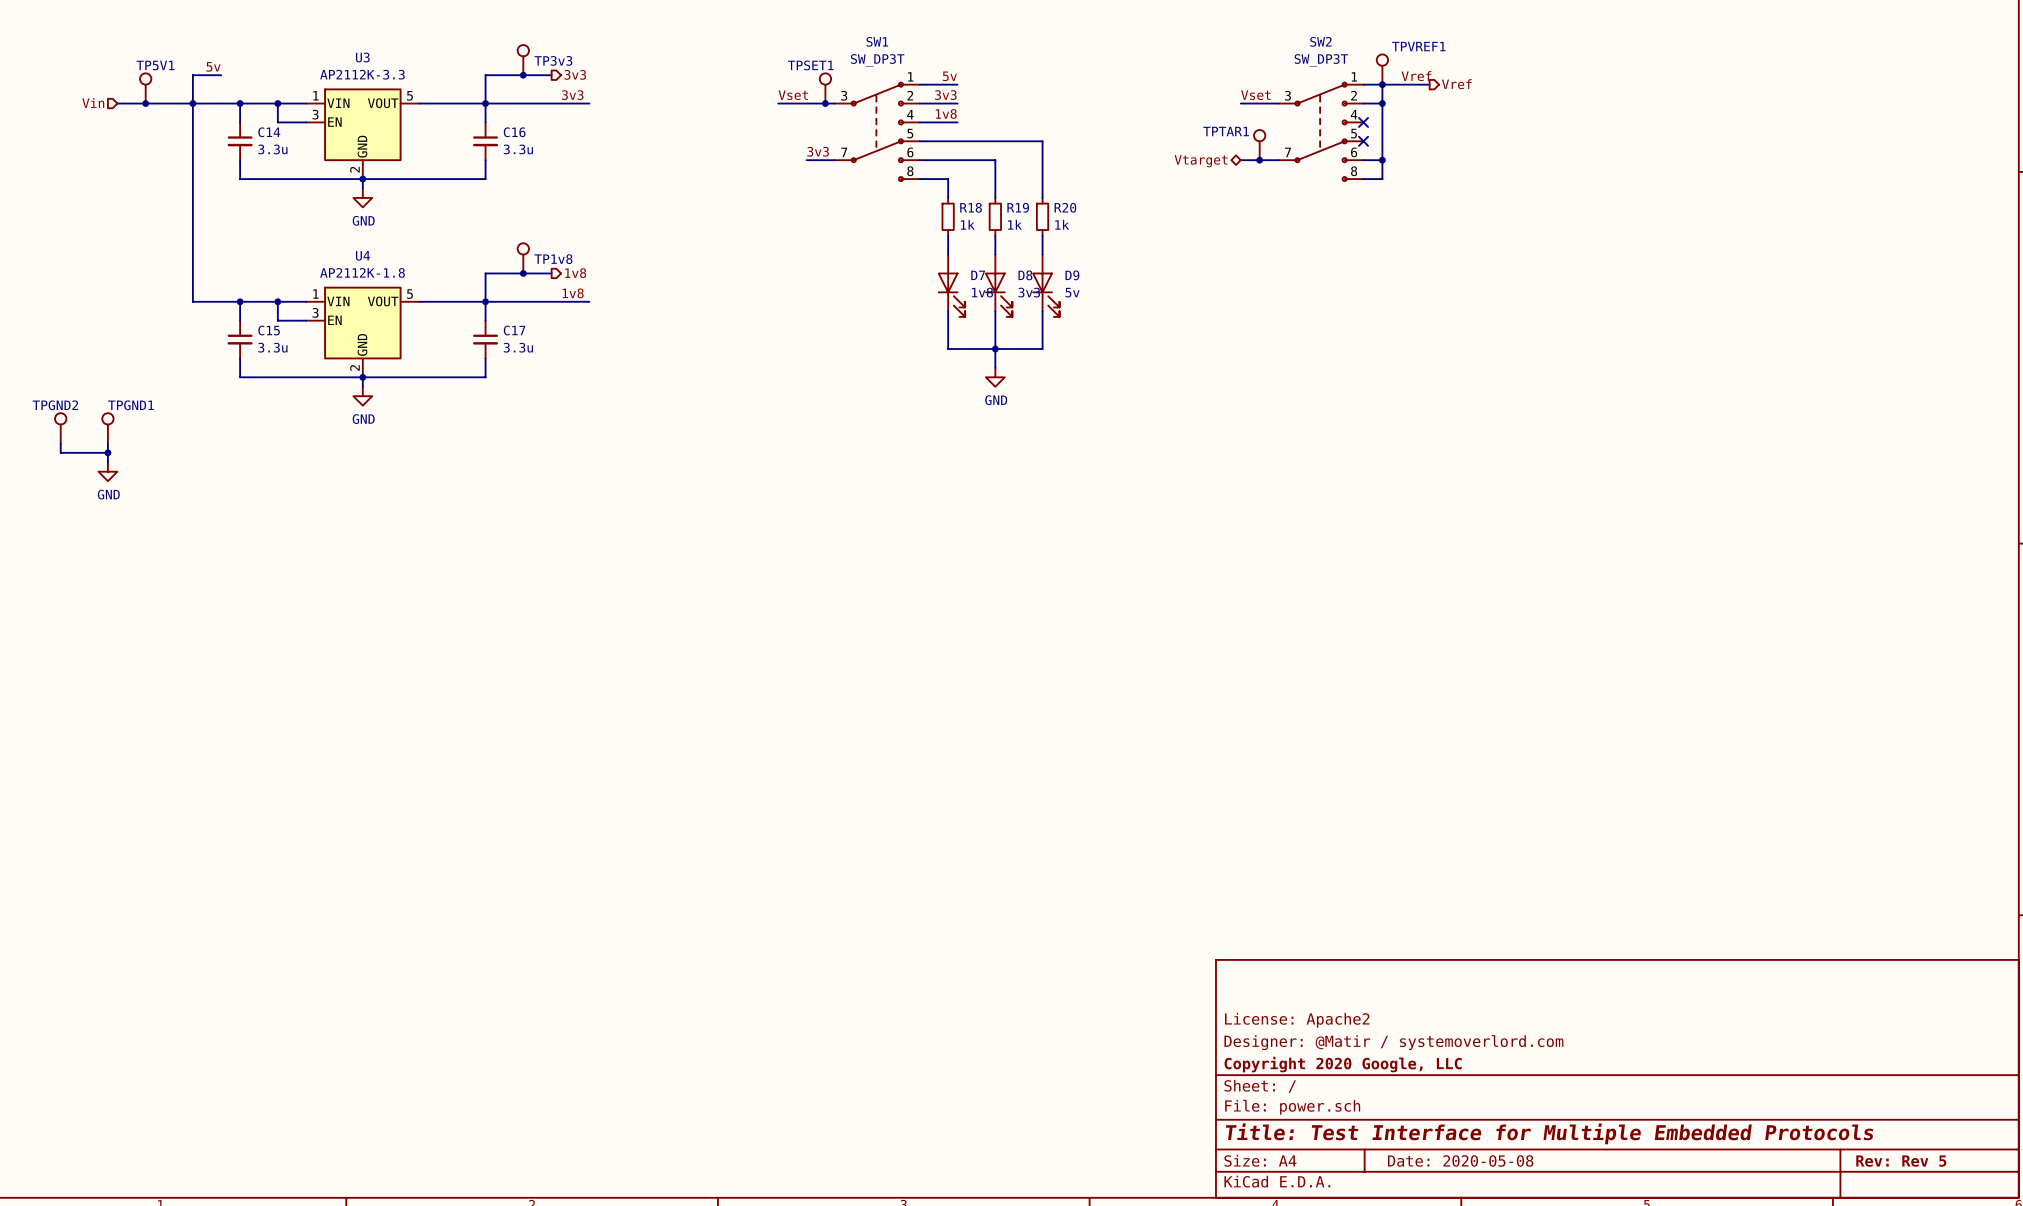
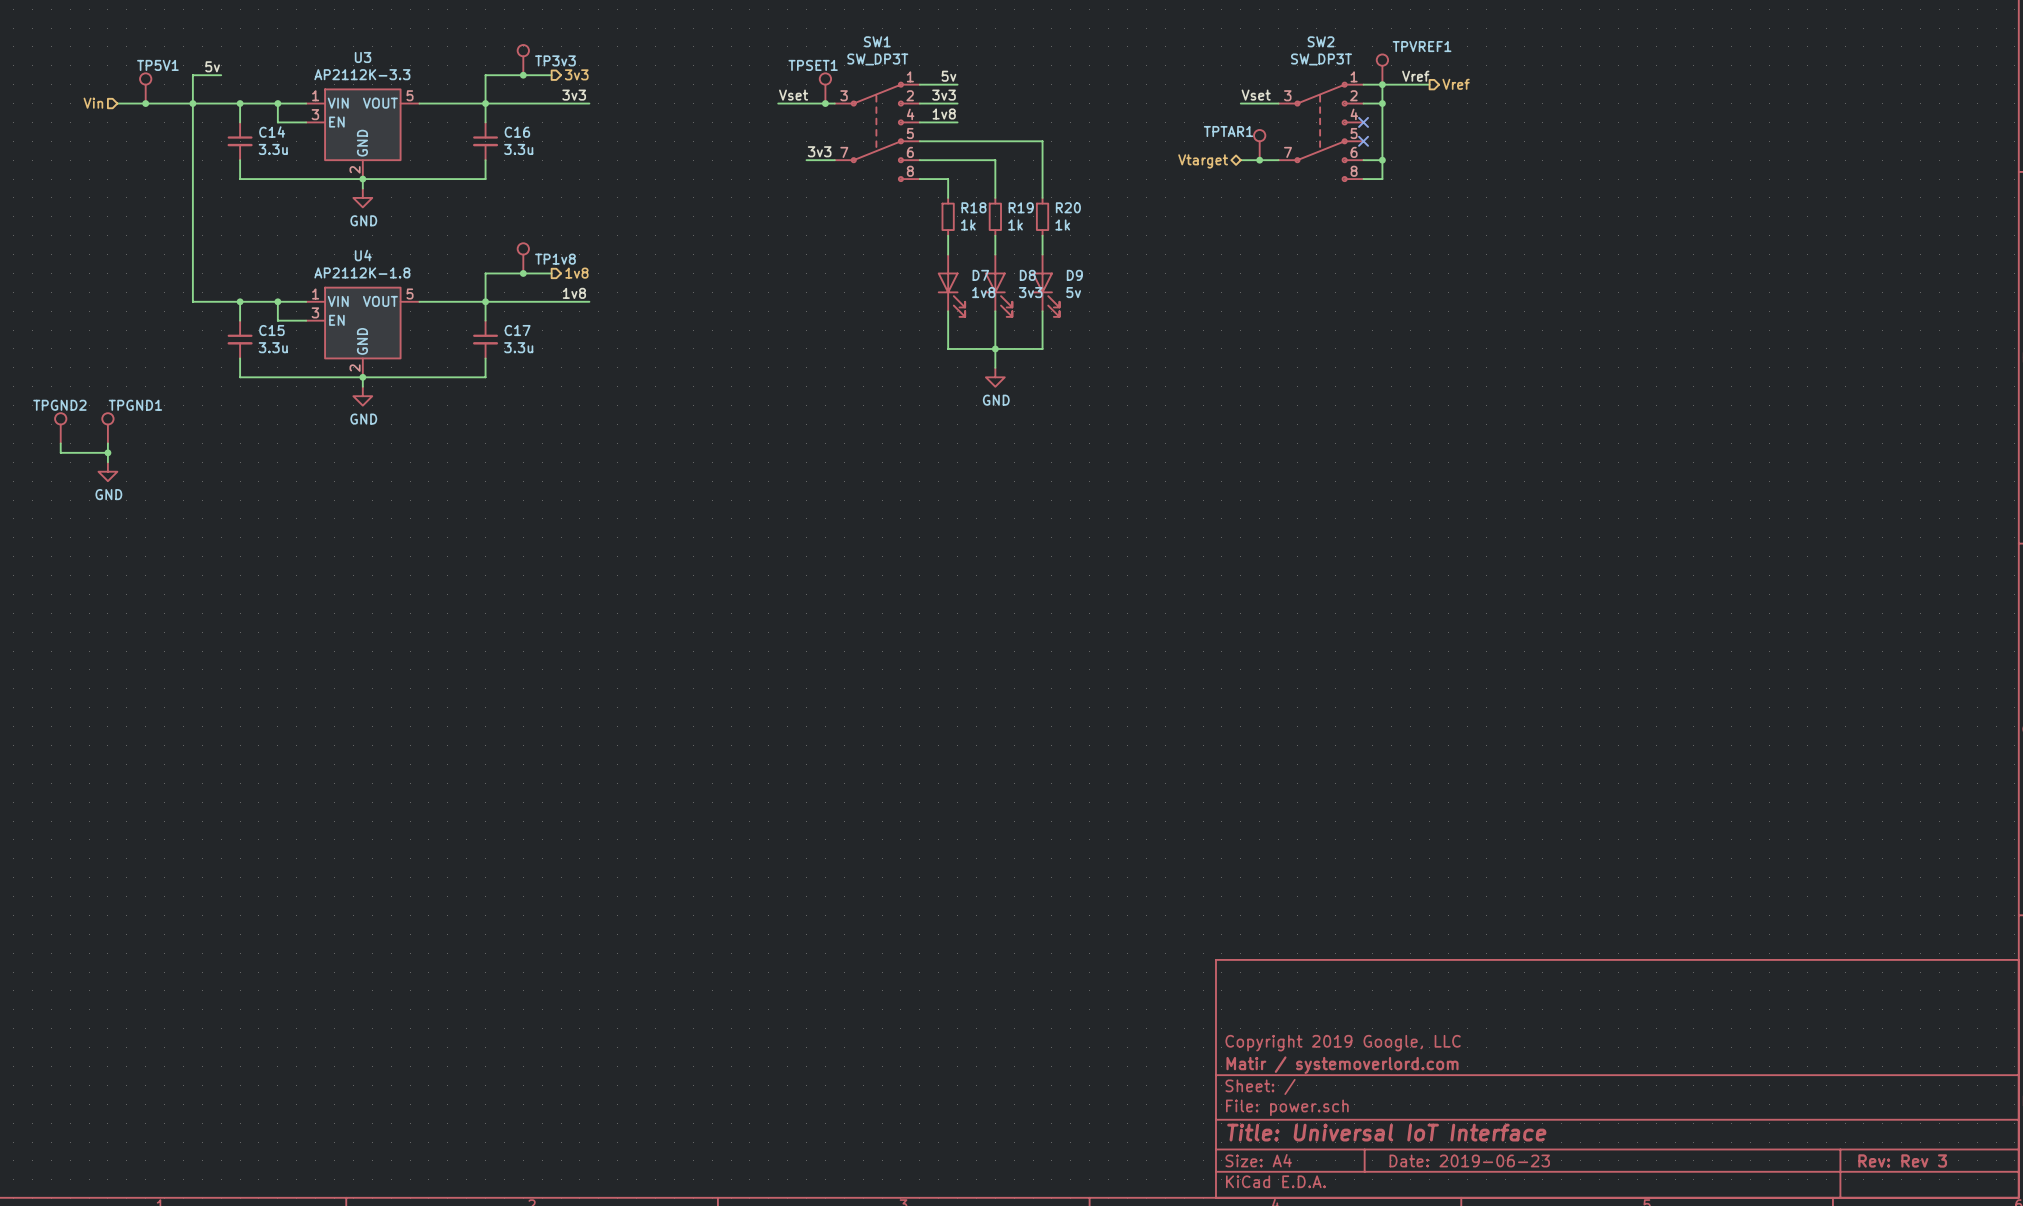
title block: License: Apache2 (1297, 1020) -> none
title block: Designer: @Matir / systemoverlord.com (1393, 1042) -> Copyright 2019 Google, LLC (1343, 1043)
title block: Copyright 2020 Google, LLC (1343, 1064) -> Matir / systemoverlord.com (1342, 1065)
title block: Title: Test Interface for Multiple Embedded Protocols (1549, 1133) -> Title: Universal IoT Interface (1386, 1132)
title block: Date: 2020-05-08 (1460, 1160) -> Date: 2019-06-23 (1469, 1160)
title block: Rev: Rev 5 (1901, 1161) -> Rev: Rev 3 (1902, 1160)

